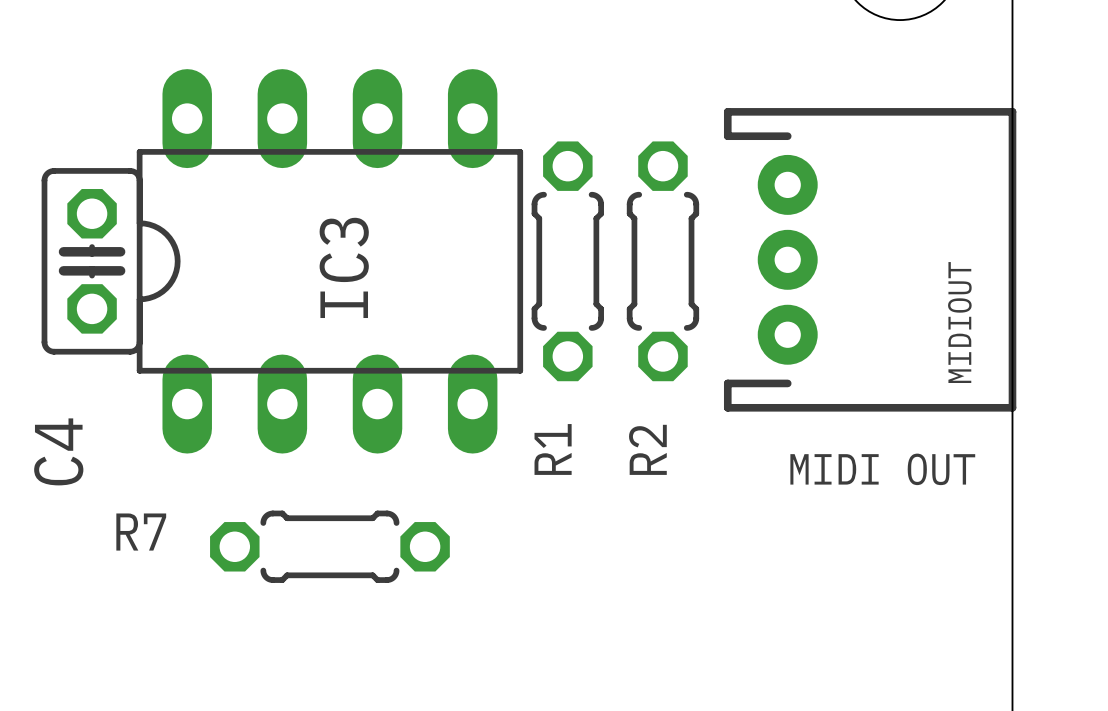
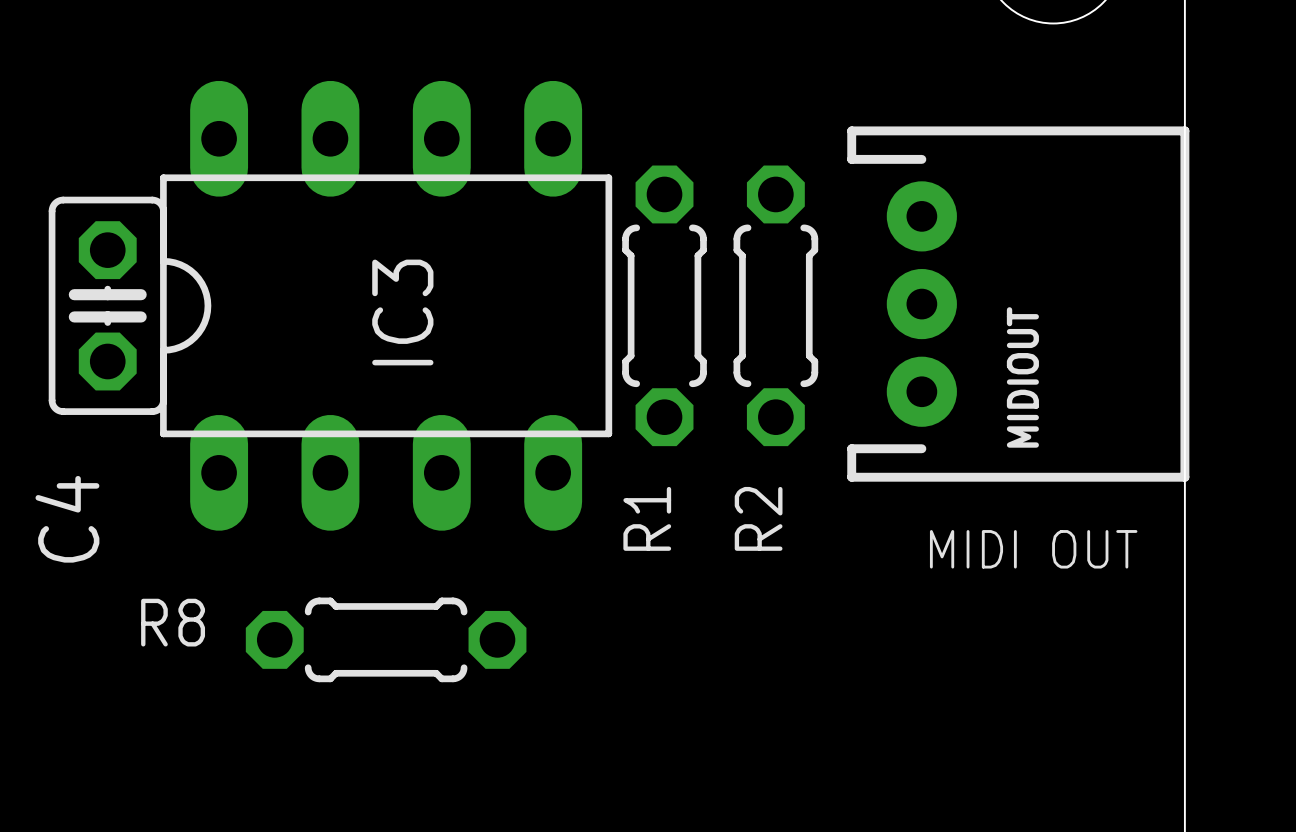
MIDIOUT name position: MIDIOUT (959, 322) -> MIDIOUT (1022, 377)
R7 name: R7 (141, 532) -> R8 (173, 622)

